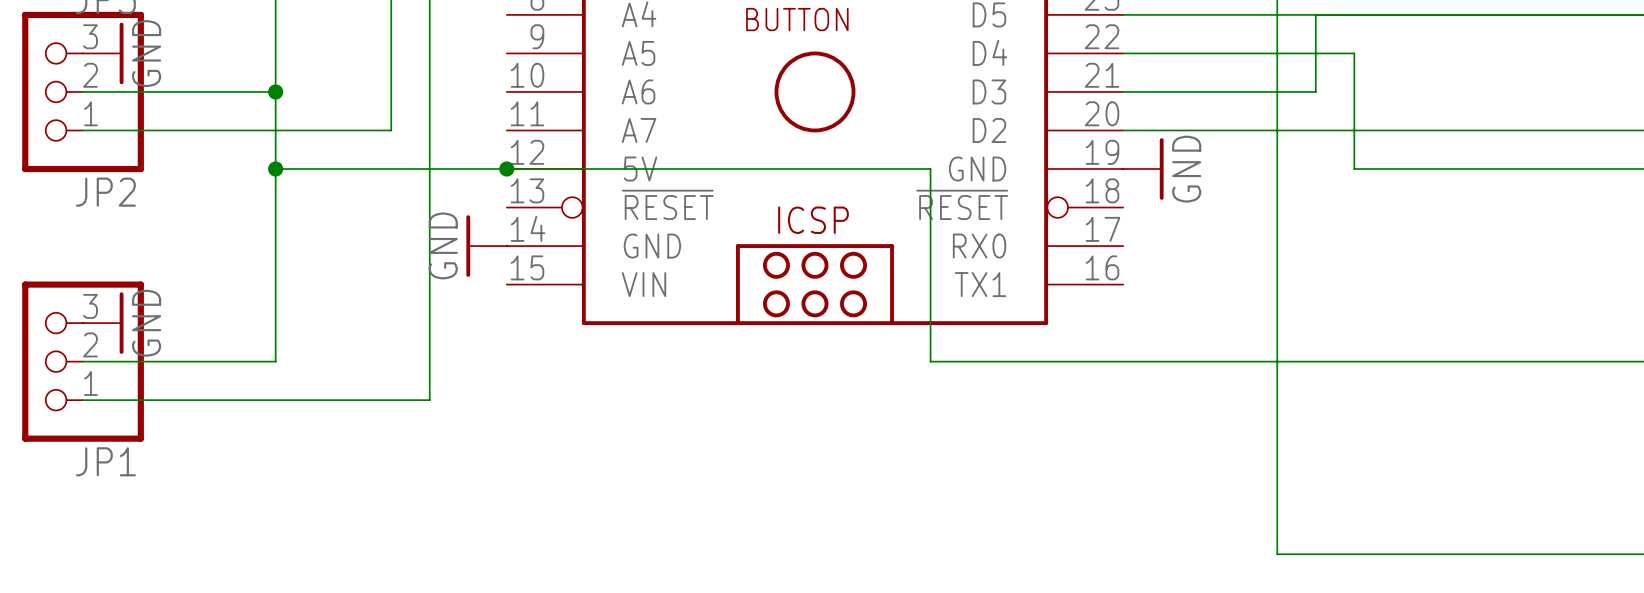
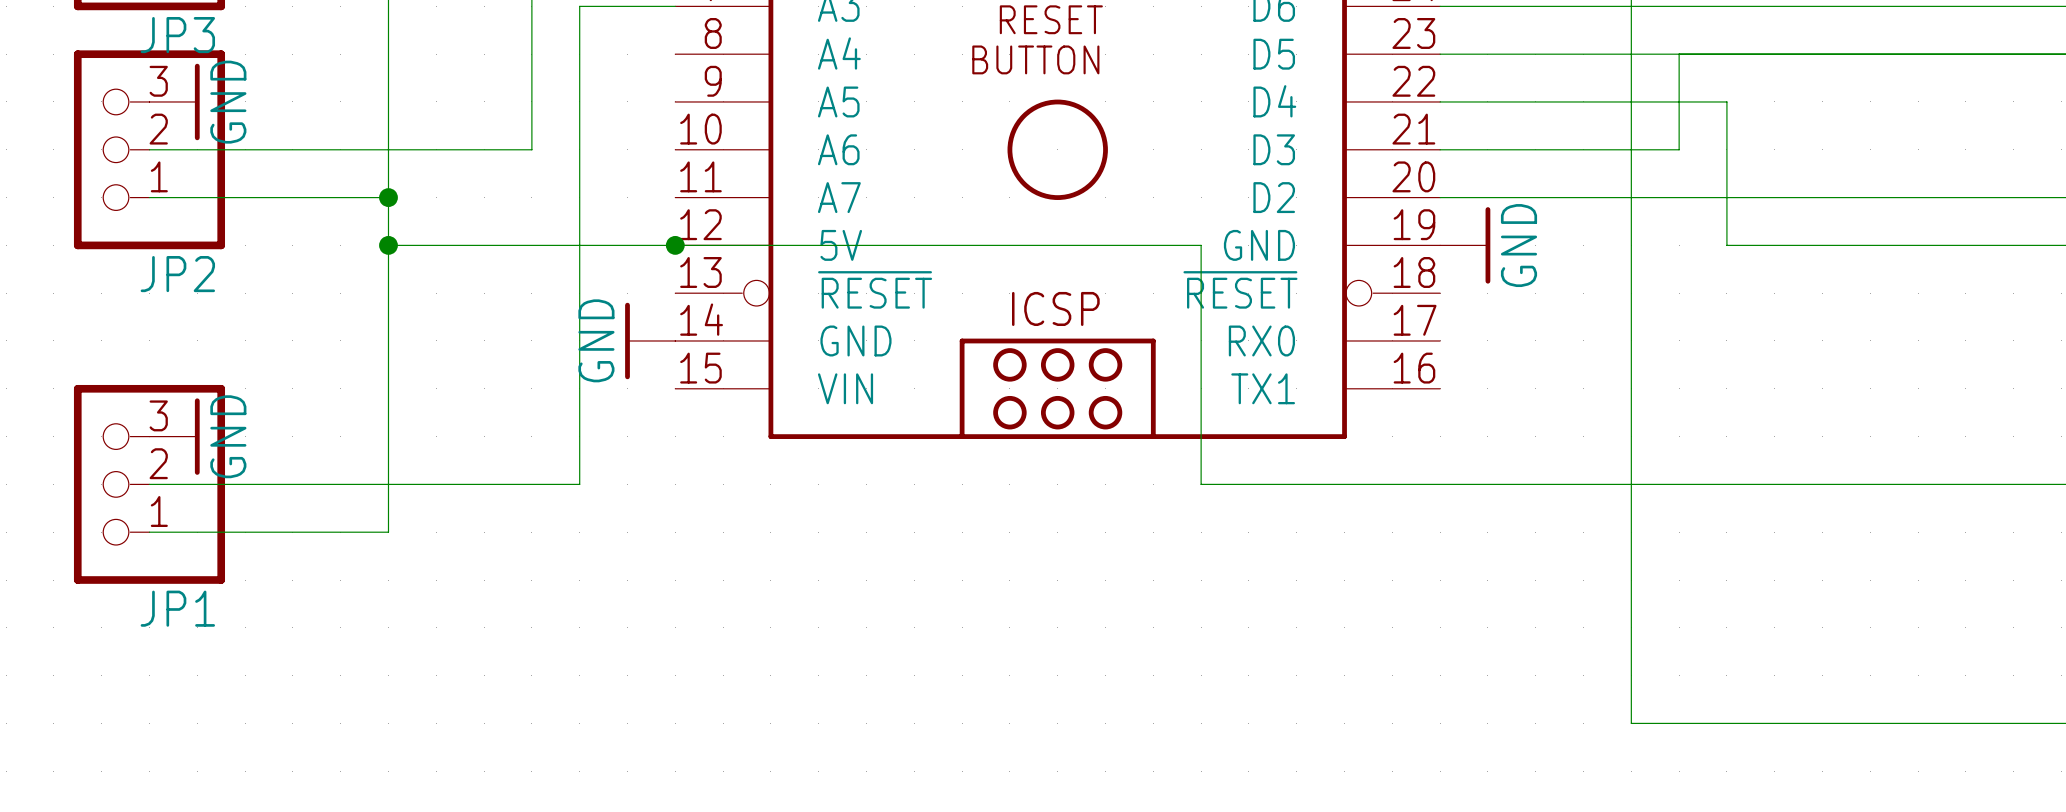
junction position: (275, 91) -> (388, 197)
wire: (391, 91) (391, 130) (275, 130) -> (531, 149) (388, 149)
wire: (429, 361) (429, 400) (275, 400) -> (579, 484) (388, 484) (388, 532)

